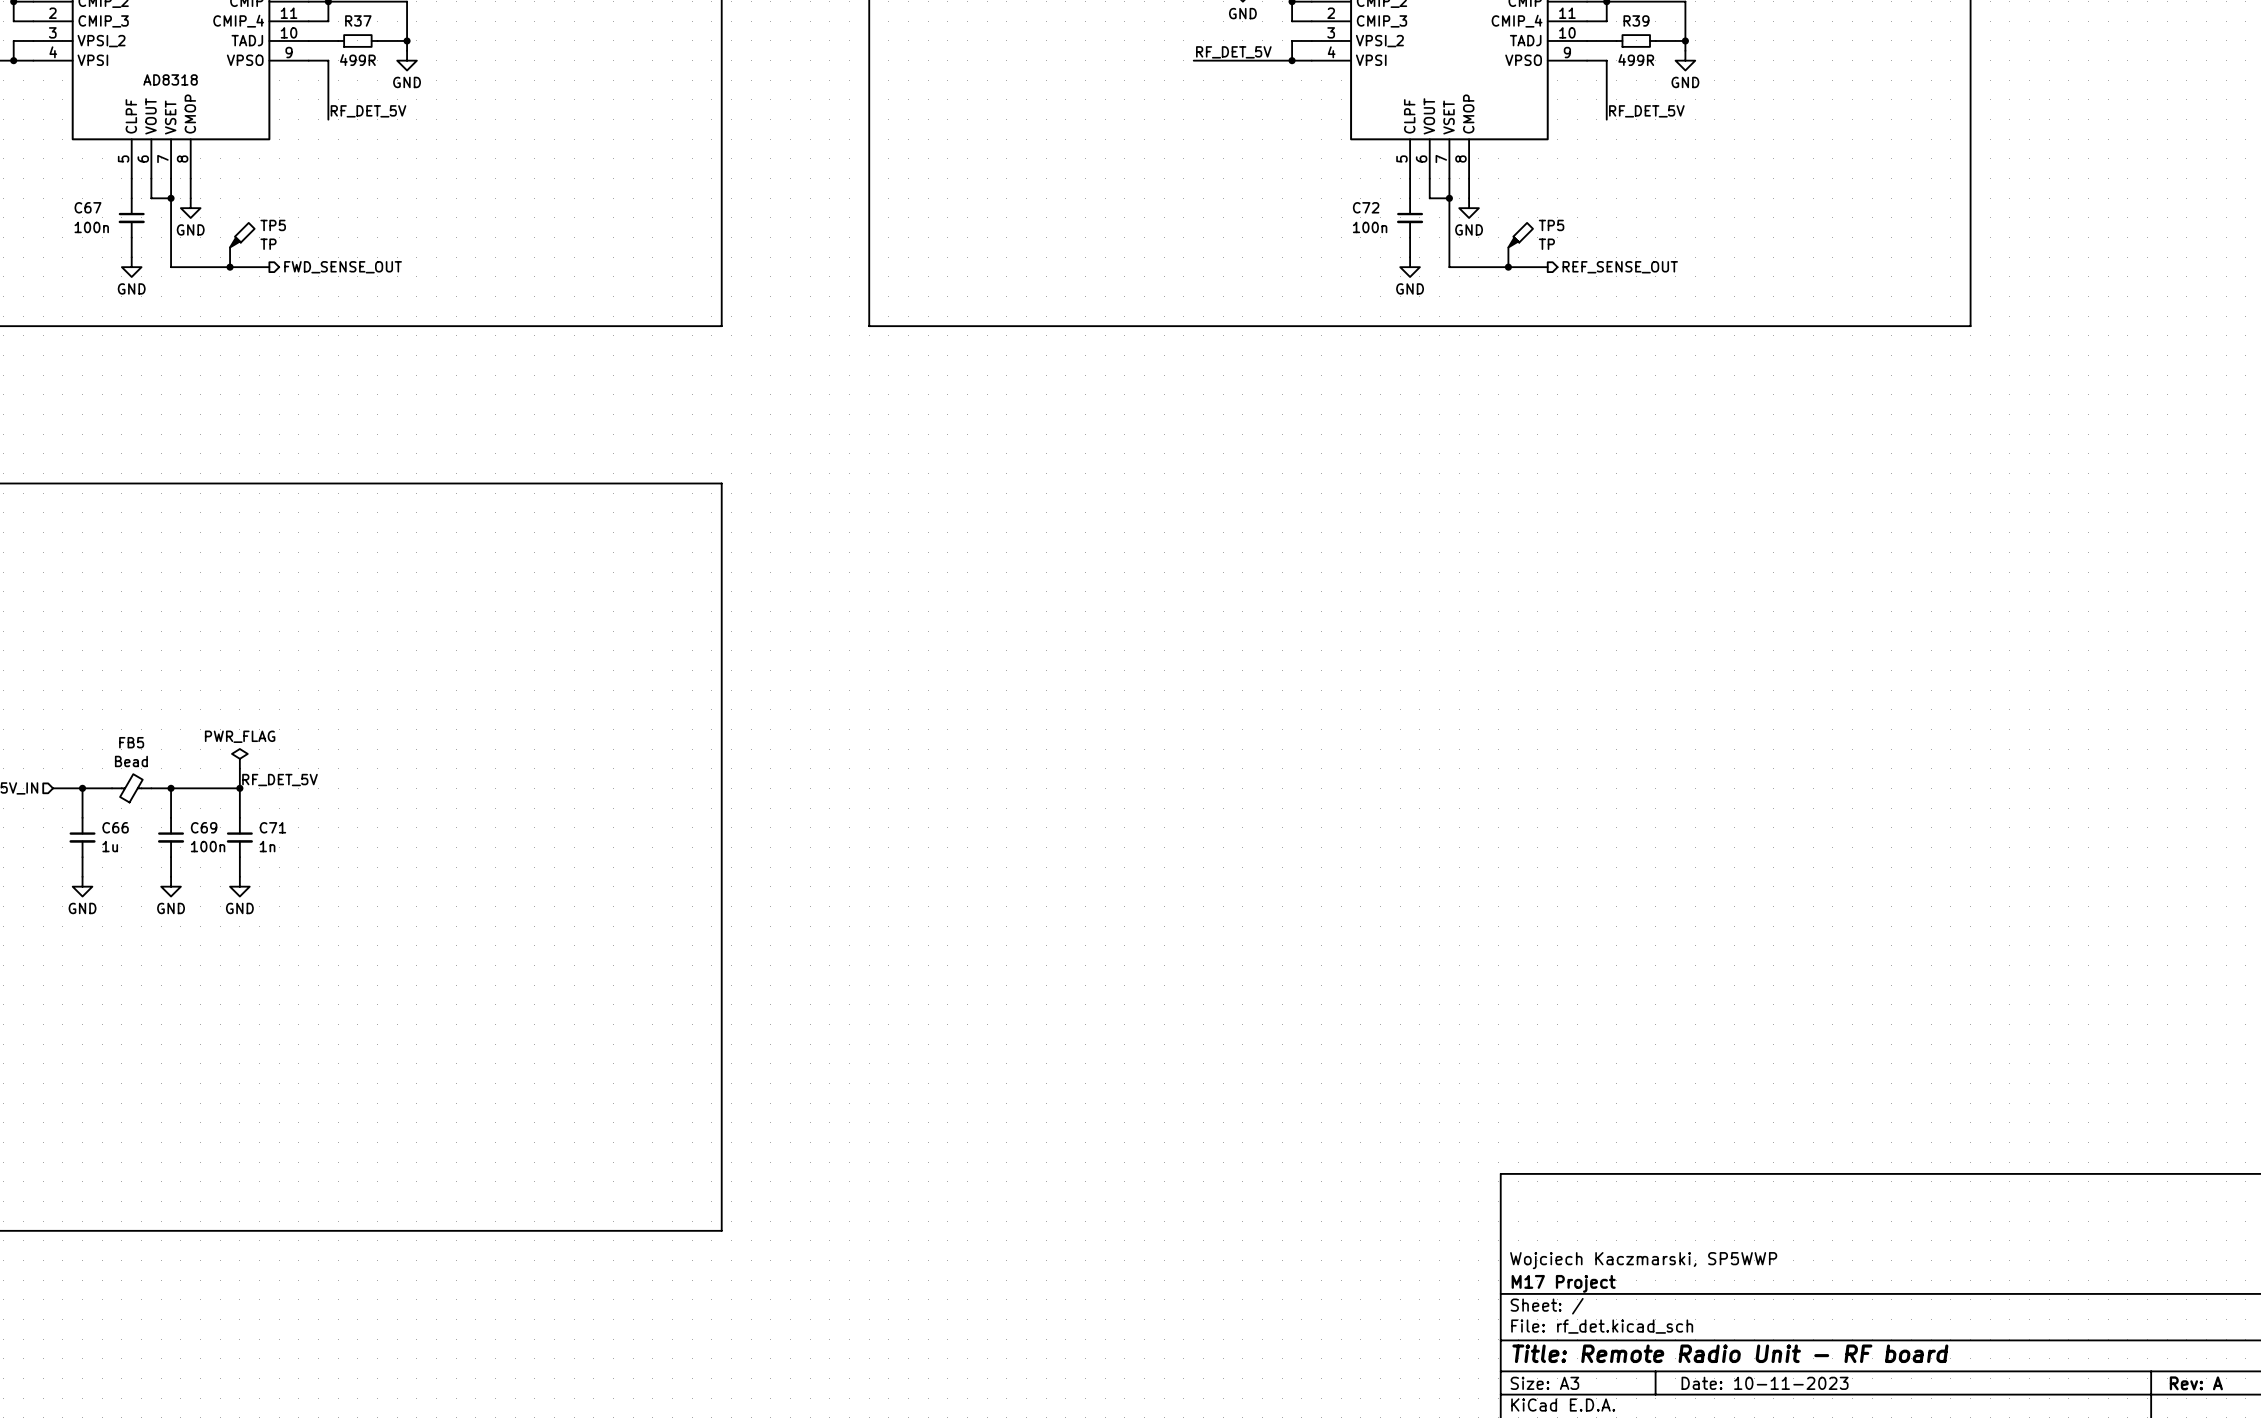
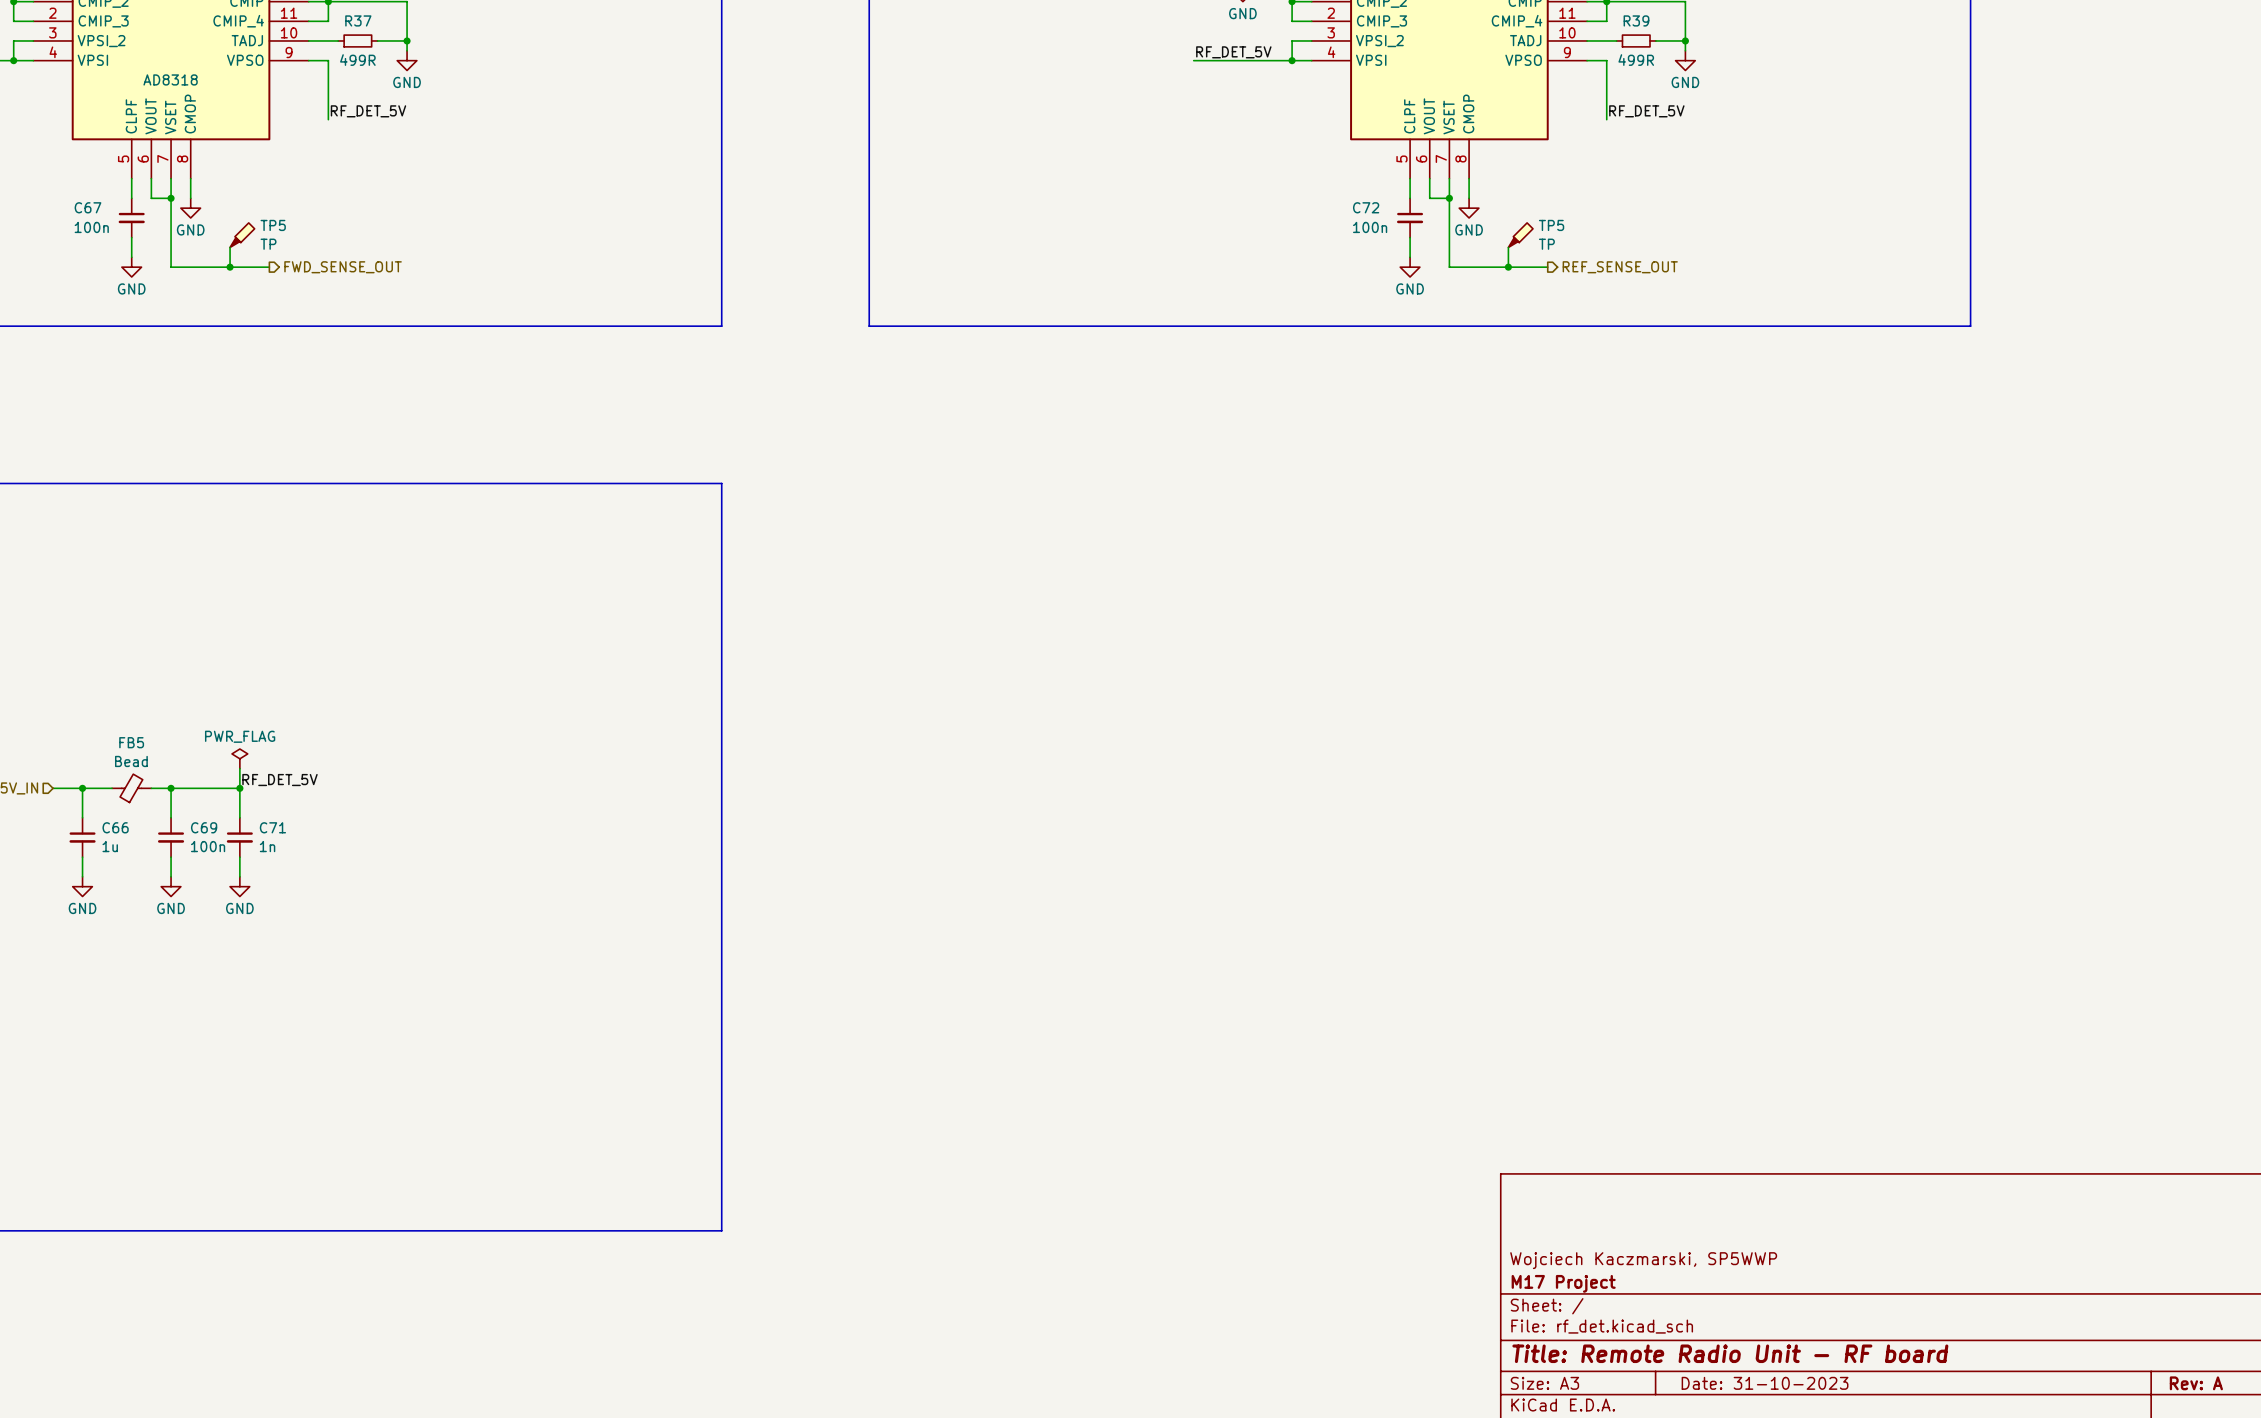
title block: Date: 10-11-2023 (1765, 1383) -> Date: 31-10-2023 (1765, 1383)

